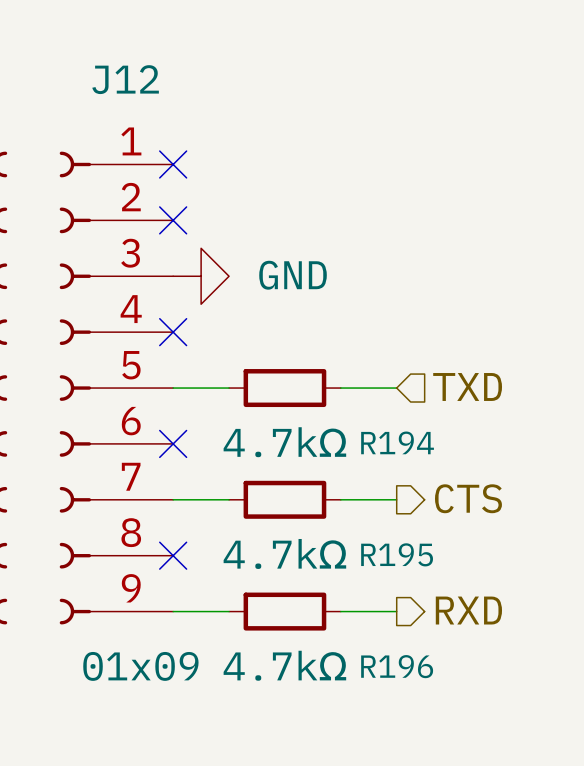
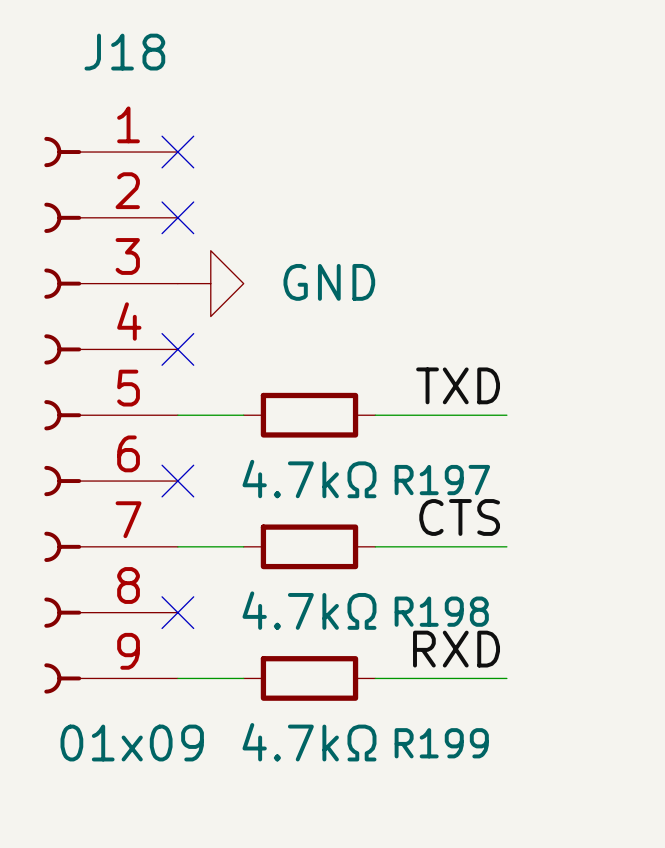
J12 name: J12 (125, 79) -> J18 (124, 52)
label: none -> TXD (458, 385)
hierarchical label: TXD (467, 386) -> none
wire: none -> (441, 415) (506, 415)
R194 name: R194 (397, 442) -> R197 (442, 480)
label: none -> CTS (459, 517)
hierarchical label: CTS (468, 498) -> none
wire: none -> (441, 546) (506, 546)
R195 name: R195 (397, 554) -> R198 (441, 611)
label: none -> RXD (456, 649)
hierarchical label: RXD (468, 610) -> none
wire: none -> (441, 678) (506, 678)
R196 name: R196 (397, 666) -> R199 (441, 743)

